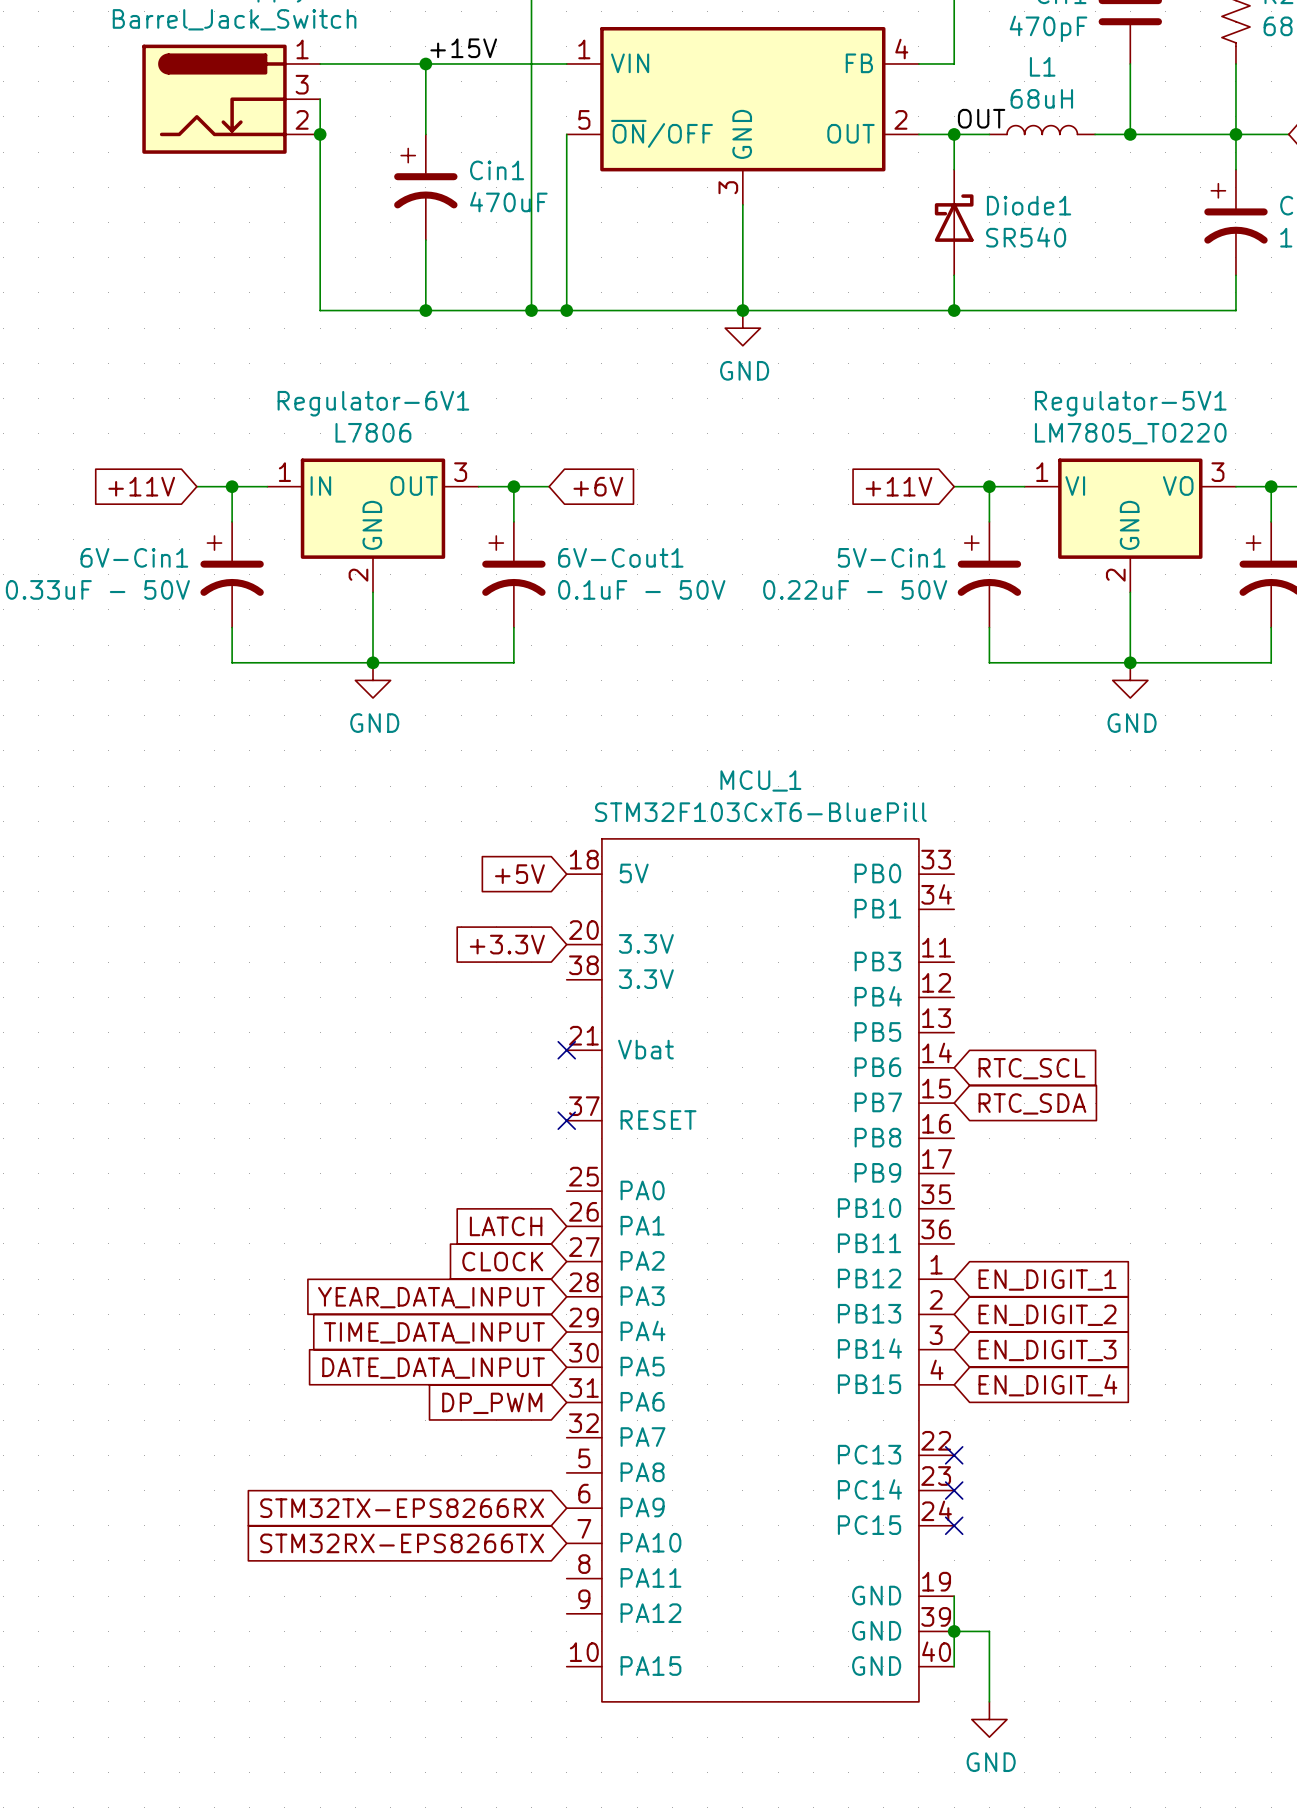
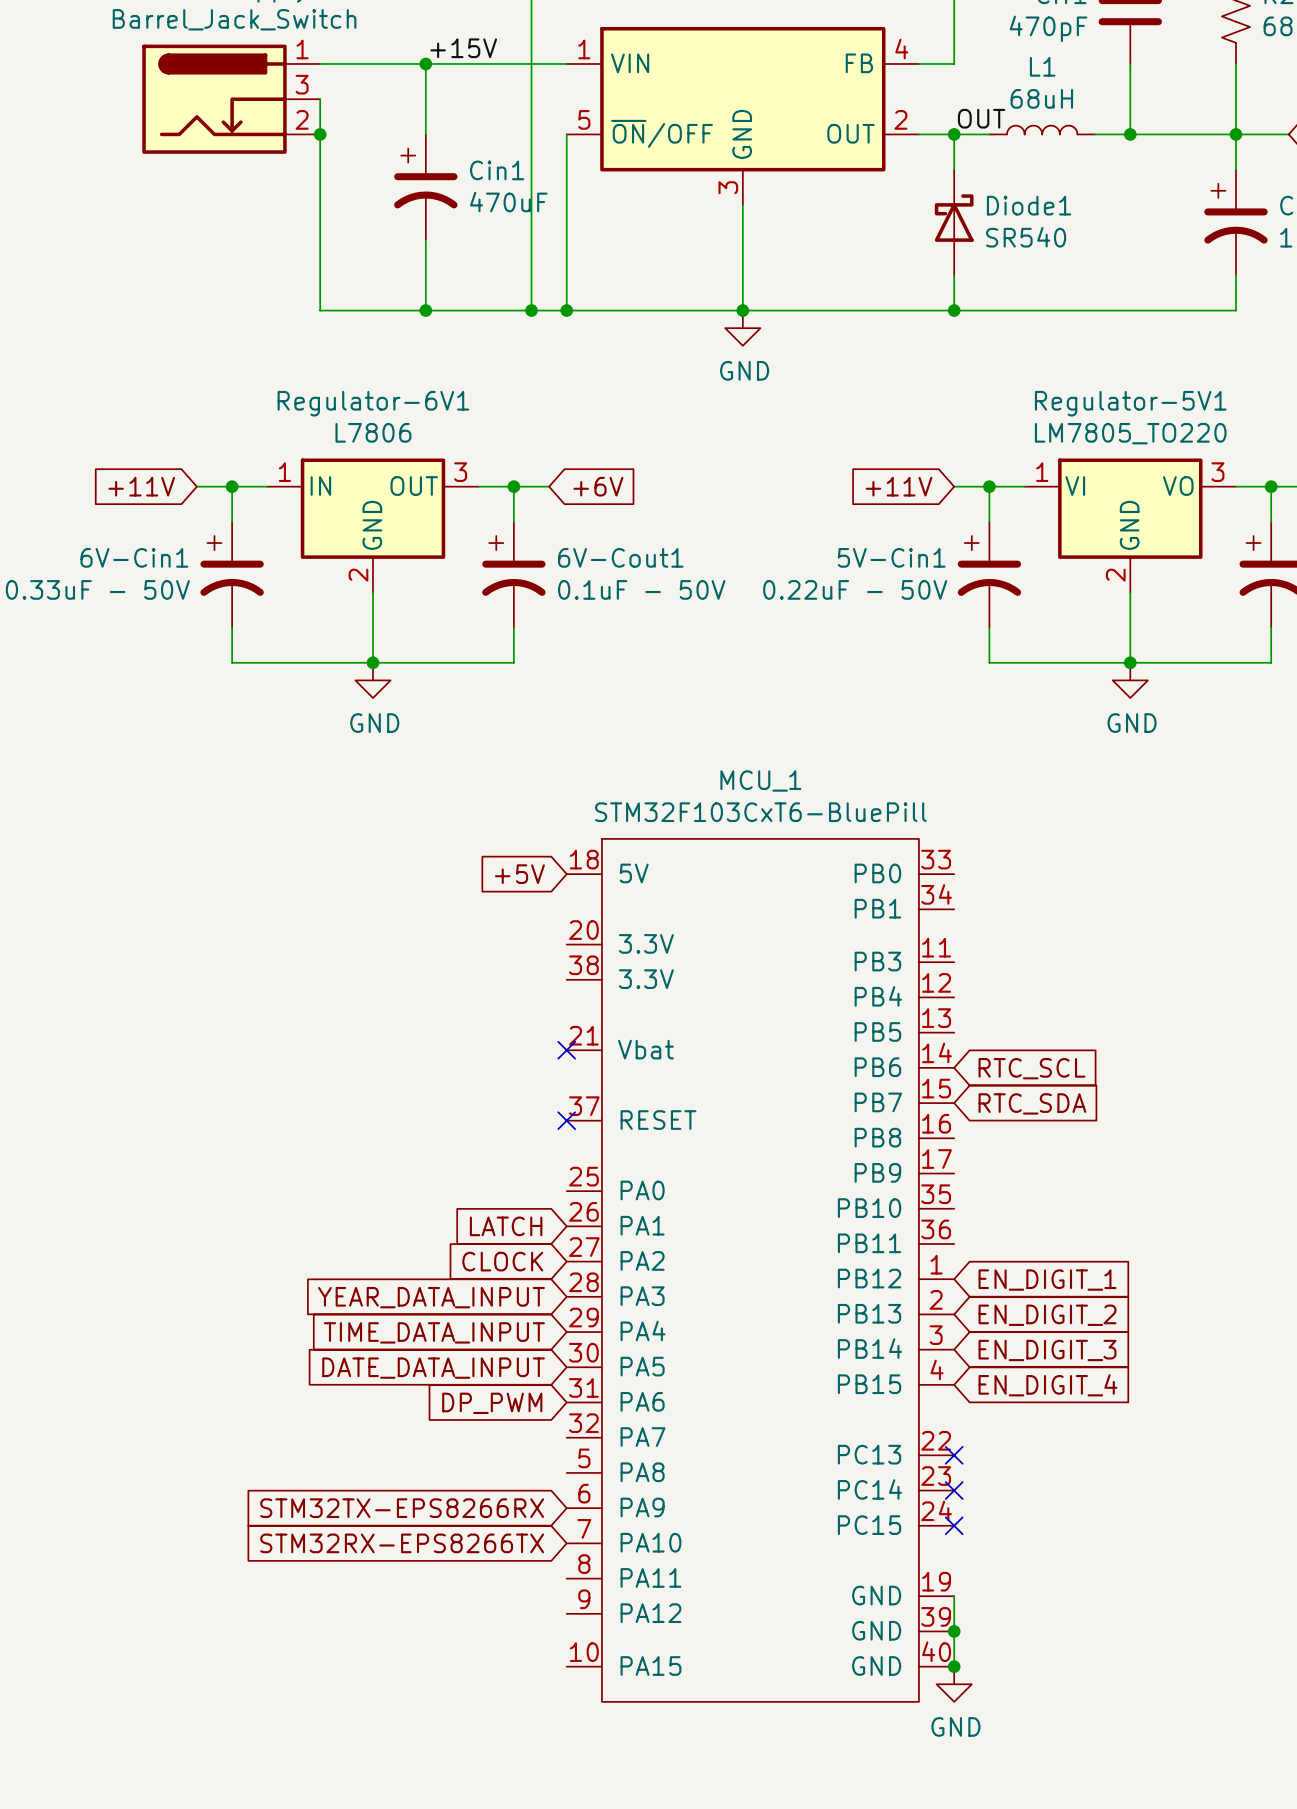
global label: +3.3V (507, 944) -> none
wire: (954, 1631) (989, 1631) (989, 1701) -> none
junction: none -> (954, 1666)
power symbol position: GND (989, 1719) -> GND (954, 1684)

